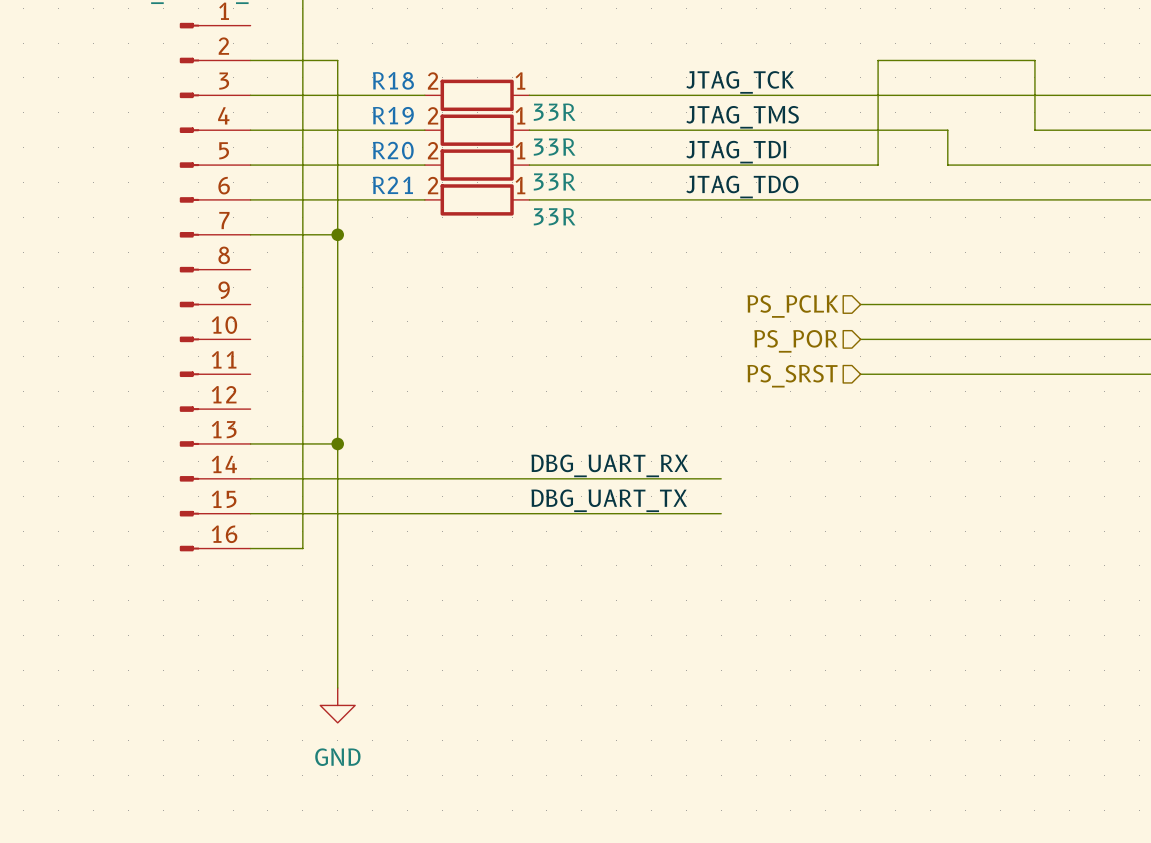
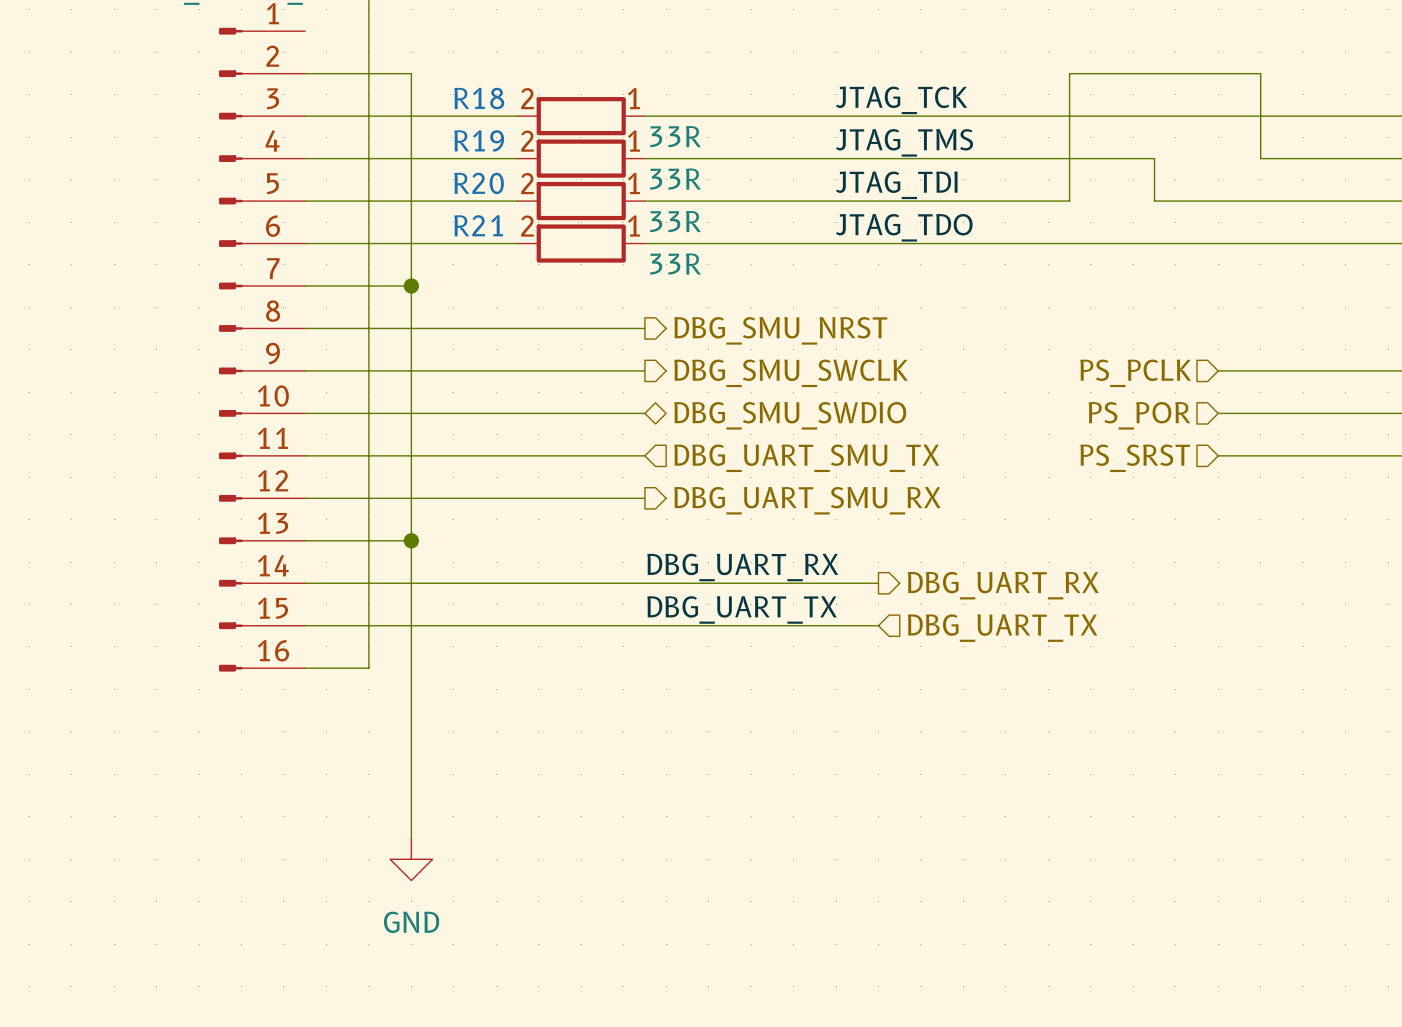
wire: none -> (305, 328) (644, 328)
hierarchical label: none -> DBG_SMU_NRST (780, 330)
wire: none -> (305, 370) (644, 370)
wire: (860, 304) (1000, 304) -> none
hierarchical label: none -> DBG_SMU_SWCLK (791, 373)
hierarchical label position: PS_PCLK (792, 306) -> PS_PCLK (1135, 373)
wire: none -> (305, 413) (644, 413)
wire: (860, 339) (1000, 339) -> none
hierarchical label: none -> DBG_SMU_SWDIO (790, 415)
hierarchical label position: PS_POR (796, 341) -> PS_POR (1139, 415)
wire: none -> (305, 455) (644, 455)
wire: (860, 374) (1000, 374) -> none
hierarchical label: none -> DBG_UART_SMU_TX (806, 458)
hierarchical label position: PS_SRST (792, 376) -> PS_SRST (1135, 458)
wire: none -> (305, 498) (644, 498)
hierarchical label: none -> DBG_UART_SMU_RX (807, 500)
hierarchical label: none -> DBG_UART_RX (1003, 585)
hierarchical label: none -> DBG_UART_TX (1002, 628)

